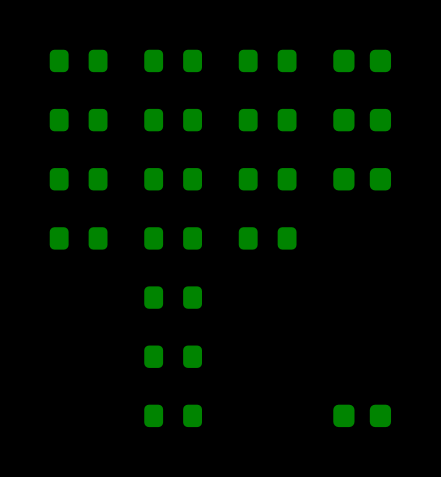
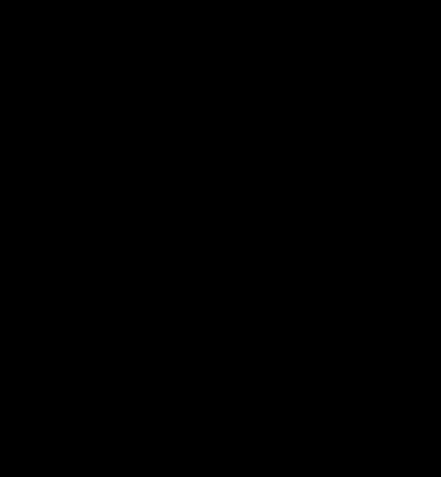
part: (78, 60) -> none
part: (173, 60) -> none
part: (267, 60) -> none
part: (362, 60) -> none
part: (78, 120) -> none
part: (173, 120) -> none
part: (267, 120) -> none
part: (362, 120) -> none
part: (78, 179) -> none
part: (173, 179) -> none
part: (267, 179) -> none
part: (362, 179) -> none
part: (78, 238) -> none
part: (173, 238) -> none
part: (267, 238) -> none
part: (173, 297) -> none
part: (173, 356) -> none
part: (173, 415) -> none
part: (362, 415) -> none

